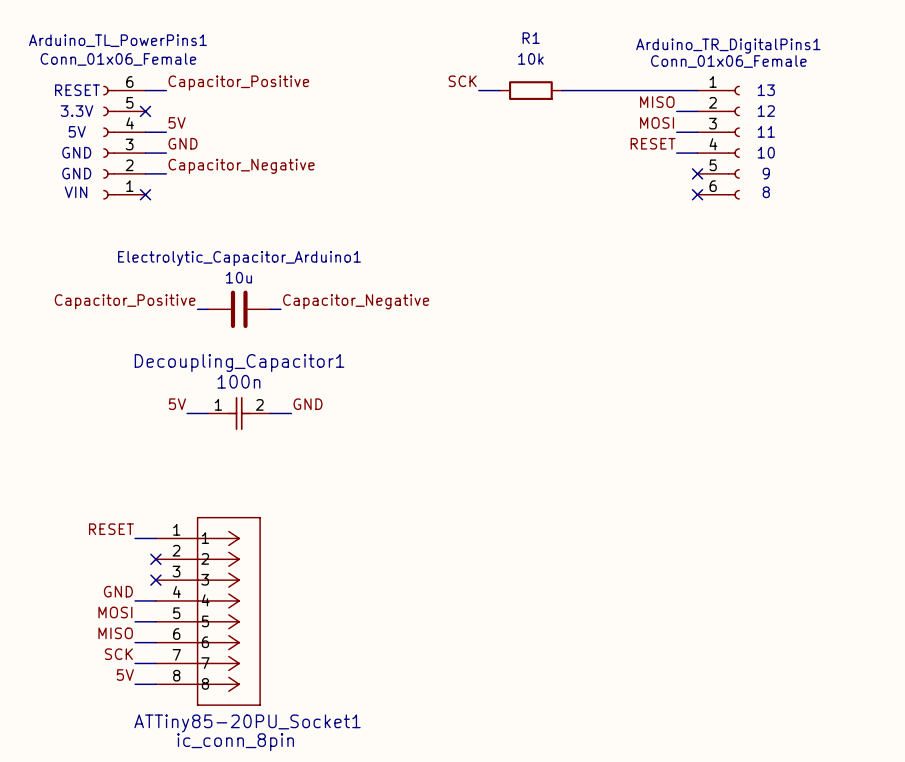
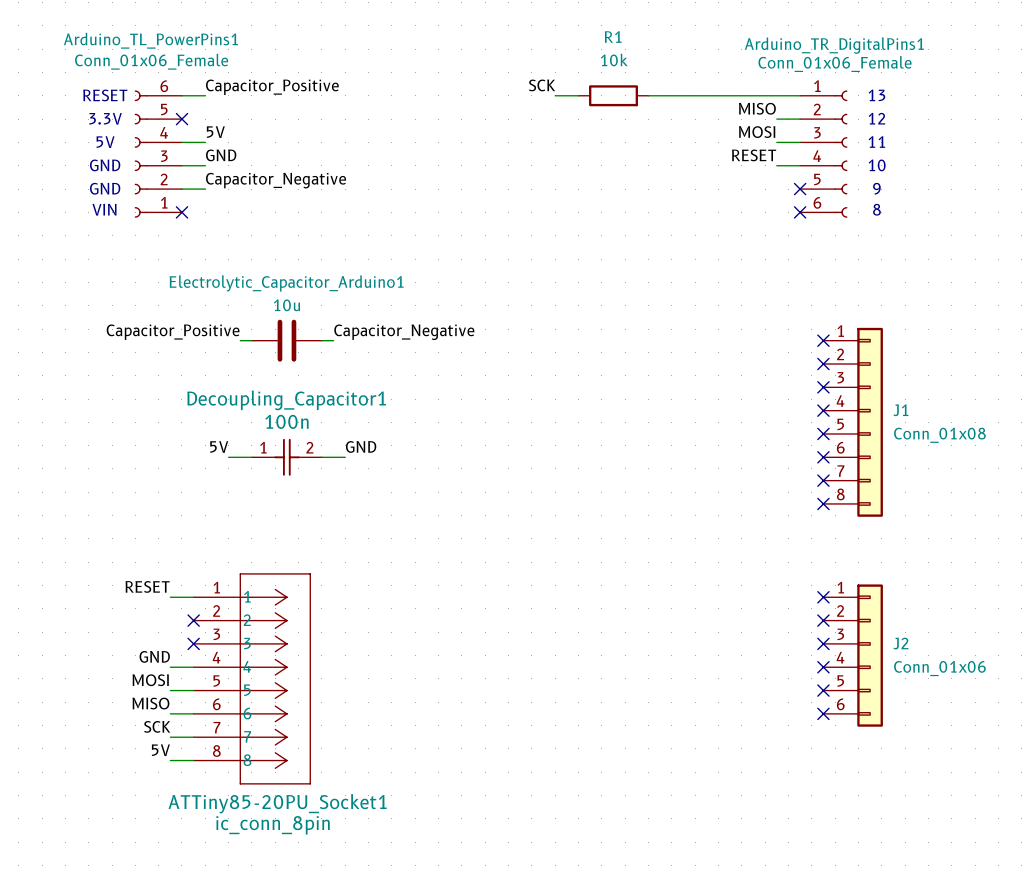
no-connect mark: none -> (823, 340)
no-connect mark: none -> (823, 364)
no-connect mark: none -> (823, 387)
no-connect mark: none -> (823, 410)
J1: none -> Conn_01x08 (853, 422)
no-connect mark: none -> (823, 433)
no-connect mark: none -> (823, 457)
no-connect mark: none -> (823, 480)
no-connect mark: none -> (823, 503)
no-connect mark: none -> (823, 597)
no-connect mark: none -> (823, 620)
no-connect mark: none -> (823, 643)
J2: none -> Conn_01x06 (853, 655)
no-connect mark: none -> (823, 667)
no-connect mark: none -> (823, 690)
no-connect mark: none -> (823, 713)

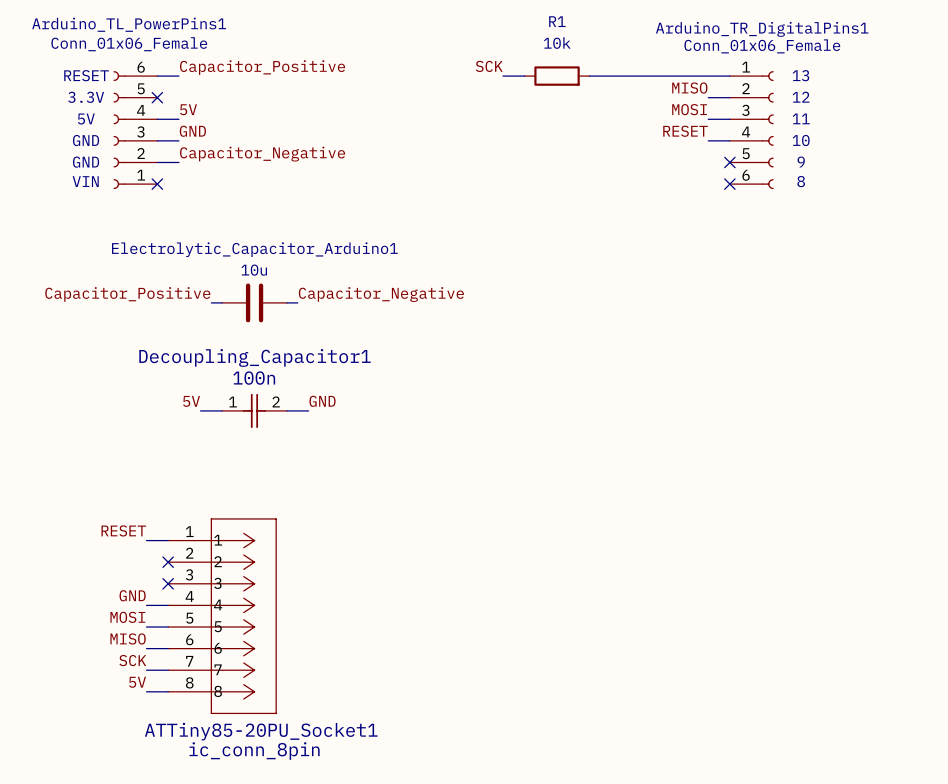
no-connect mark: (823, 340) -> none
no-connect mark: (823, 364) -> none
no-connect mark: (823, 387) -> none
no-connect mark: (823, 410) -> none
J1: Conn_01x08 (853, 422) -> none
no-connect mark: (823, 433) -> none
no-connect mark: (823, 457) -> none
no-connect mark: (823, 480) -> none
no-connect mark: (823, 503) -> none
no-connect mark: (823, 597) -> none
no-connect mark: (823, 620) -> none
no-connect mark: (823, 643) -> none
J2: Conn_01x06 (853, 655) -> none
no-connect mark: (823, 667) -> none
no-connect mark: (823, 690) -> none
no-connect mark: (823, 713) -> none

